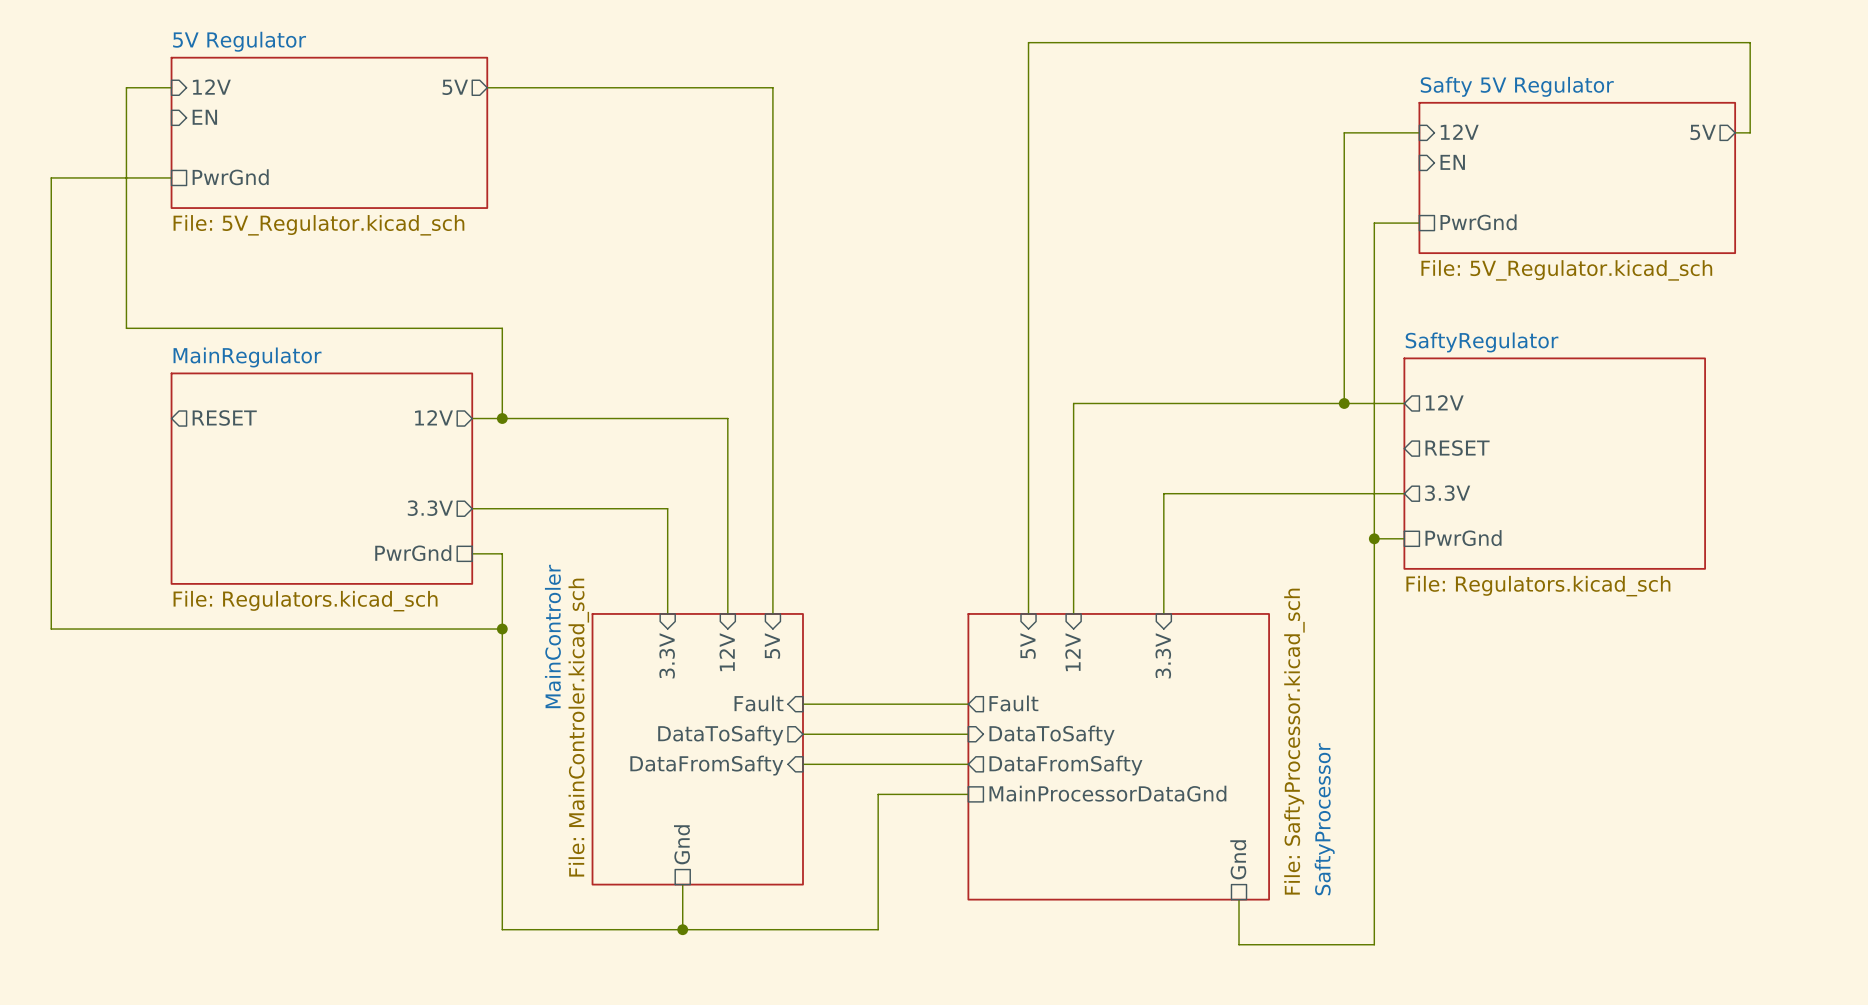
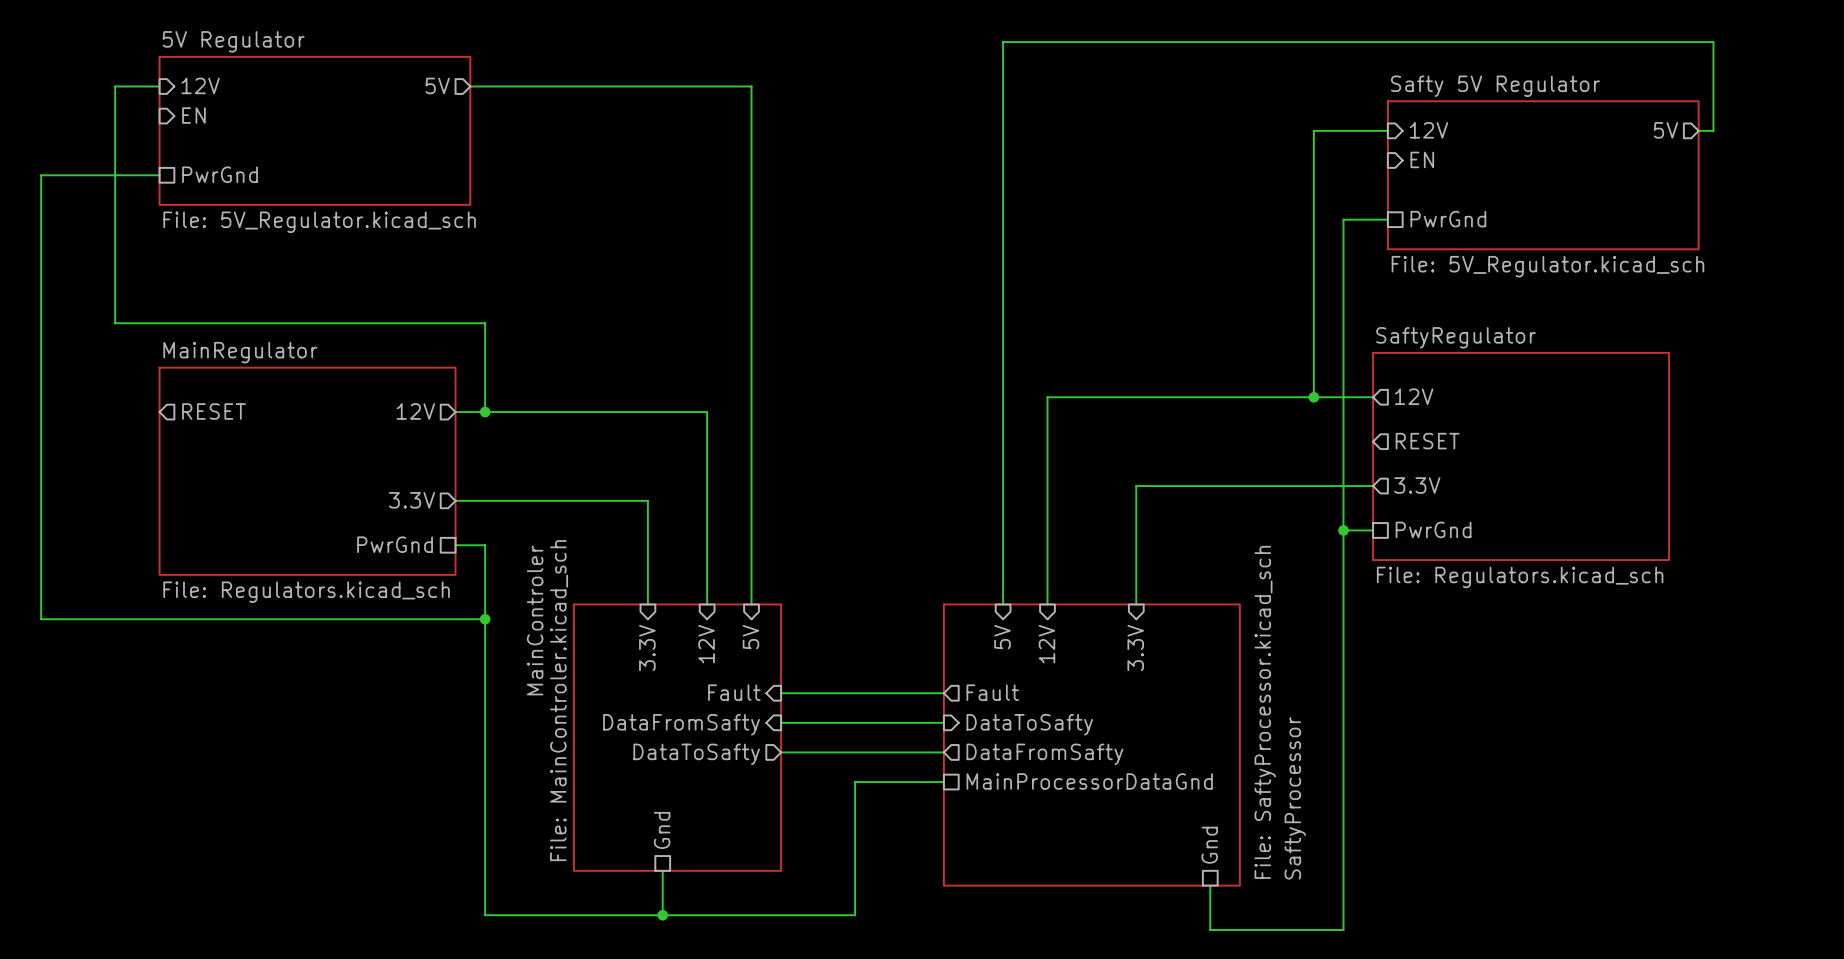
sheet pin shape: output (720, 735) -> input (681, 724)
sheet pin: DataToSafty (720, 735) -> DataFromSafty (681, 724)
sheet pin shape: input (706, 765) -> output (696, 754)
sheet pin: DataFromSafty (706, 765) -> DataToSafty (696, 754)

